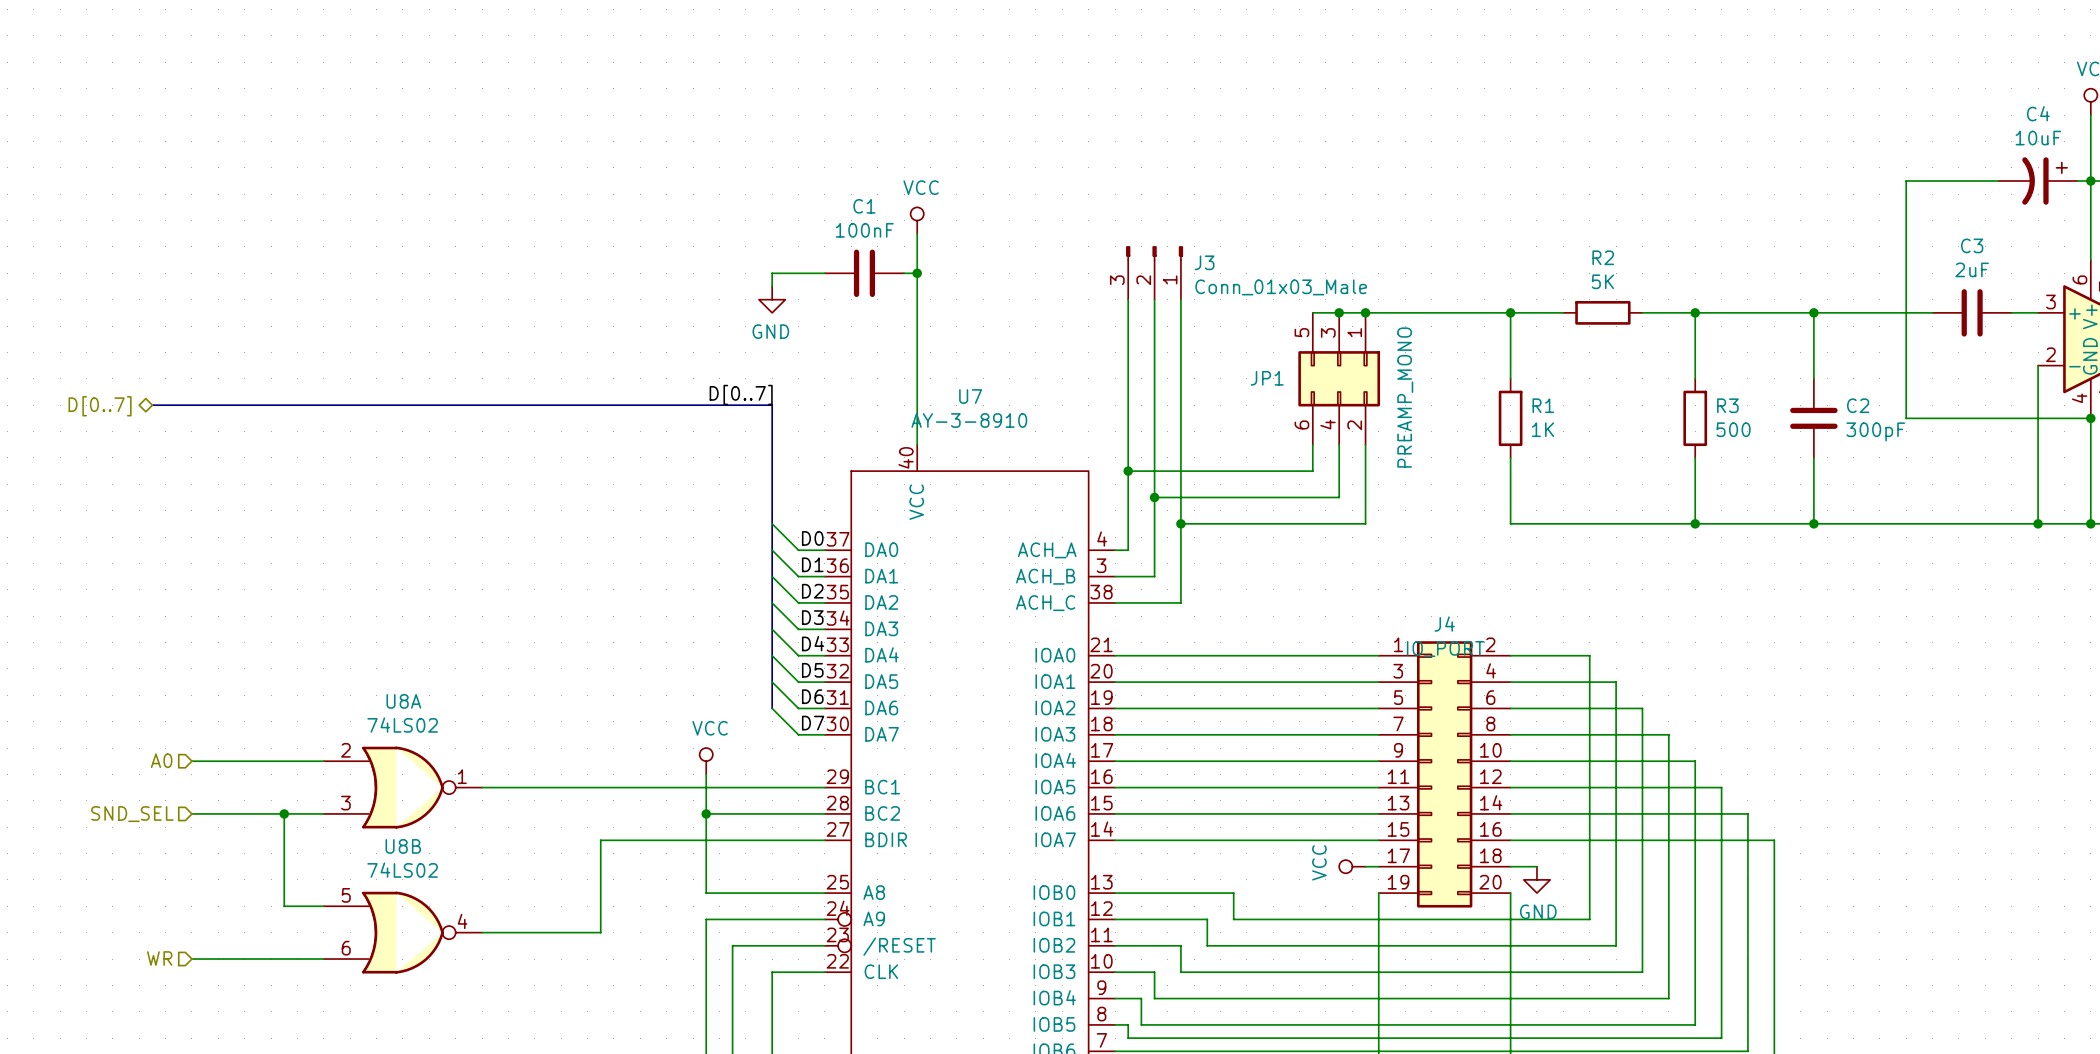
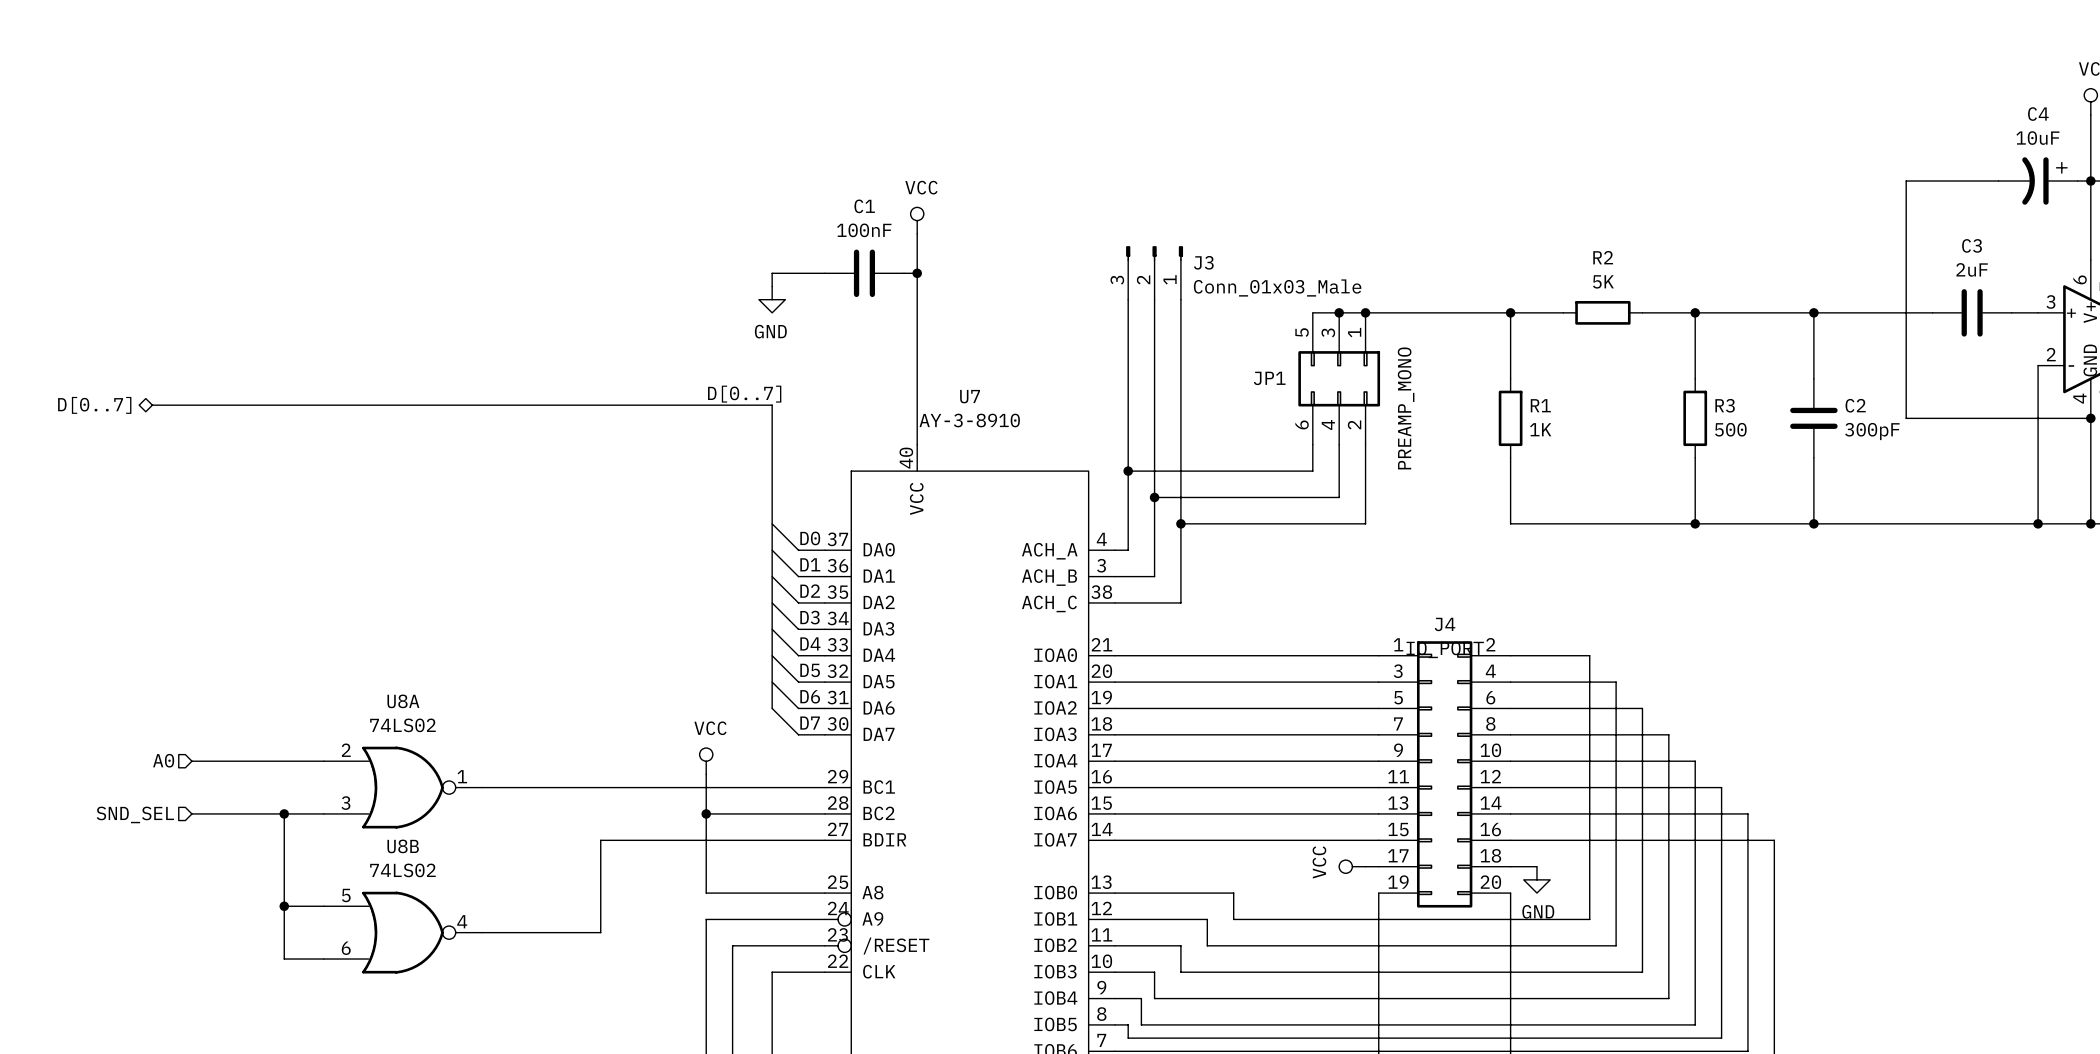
junction: none -> (284, 906)
hierarchical label: WR (159, 958) -> none
wire: (191, 959) (284, 959) -> (284, 906) (284, 959)

